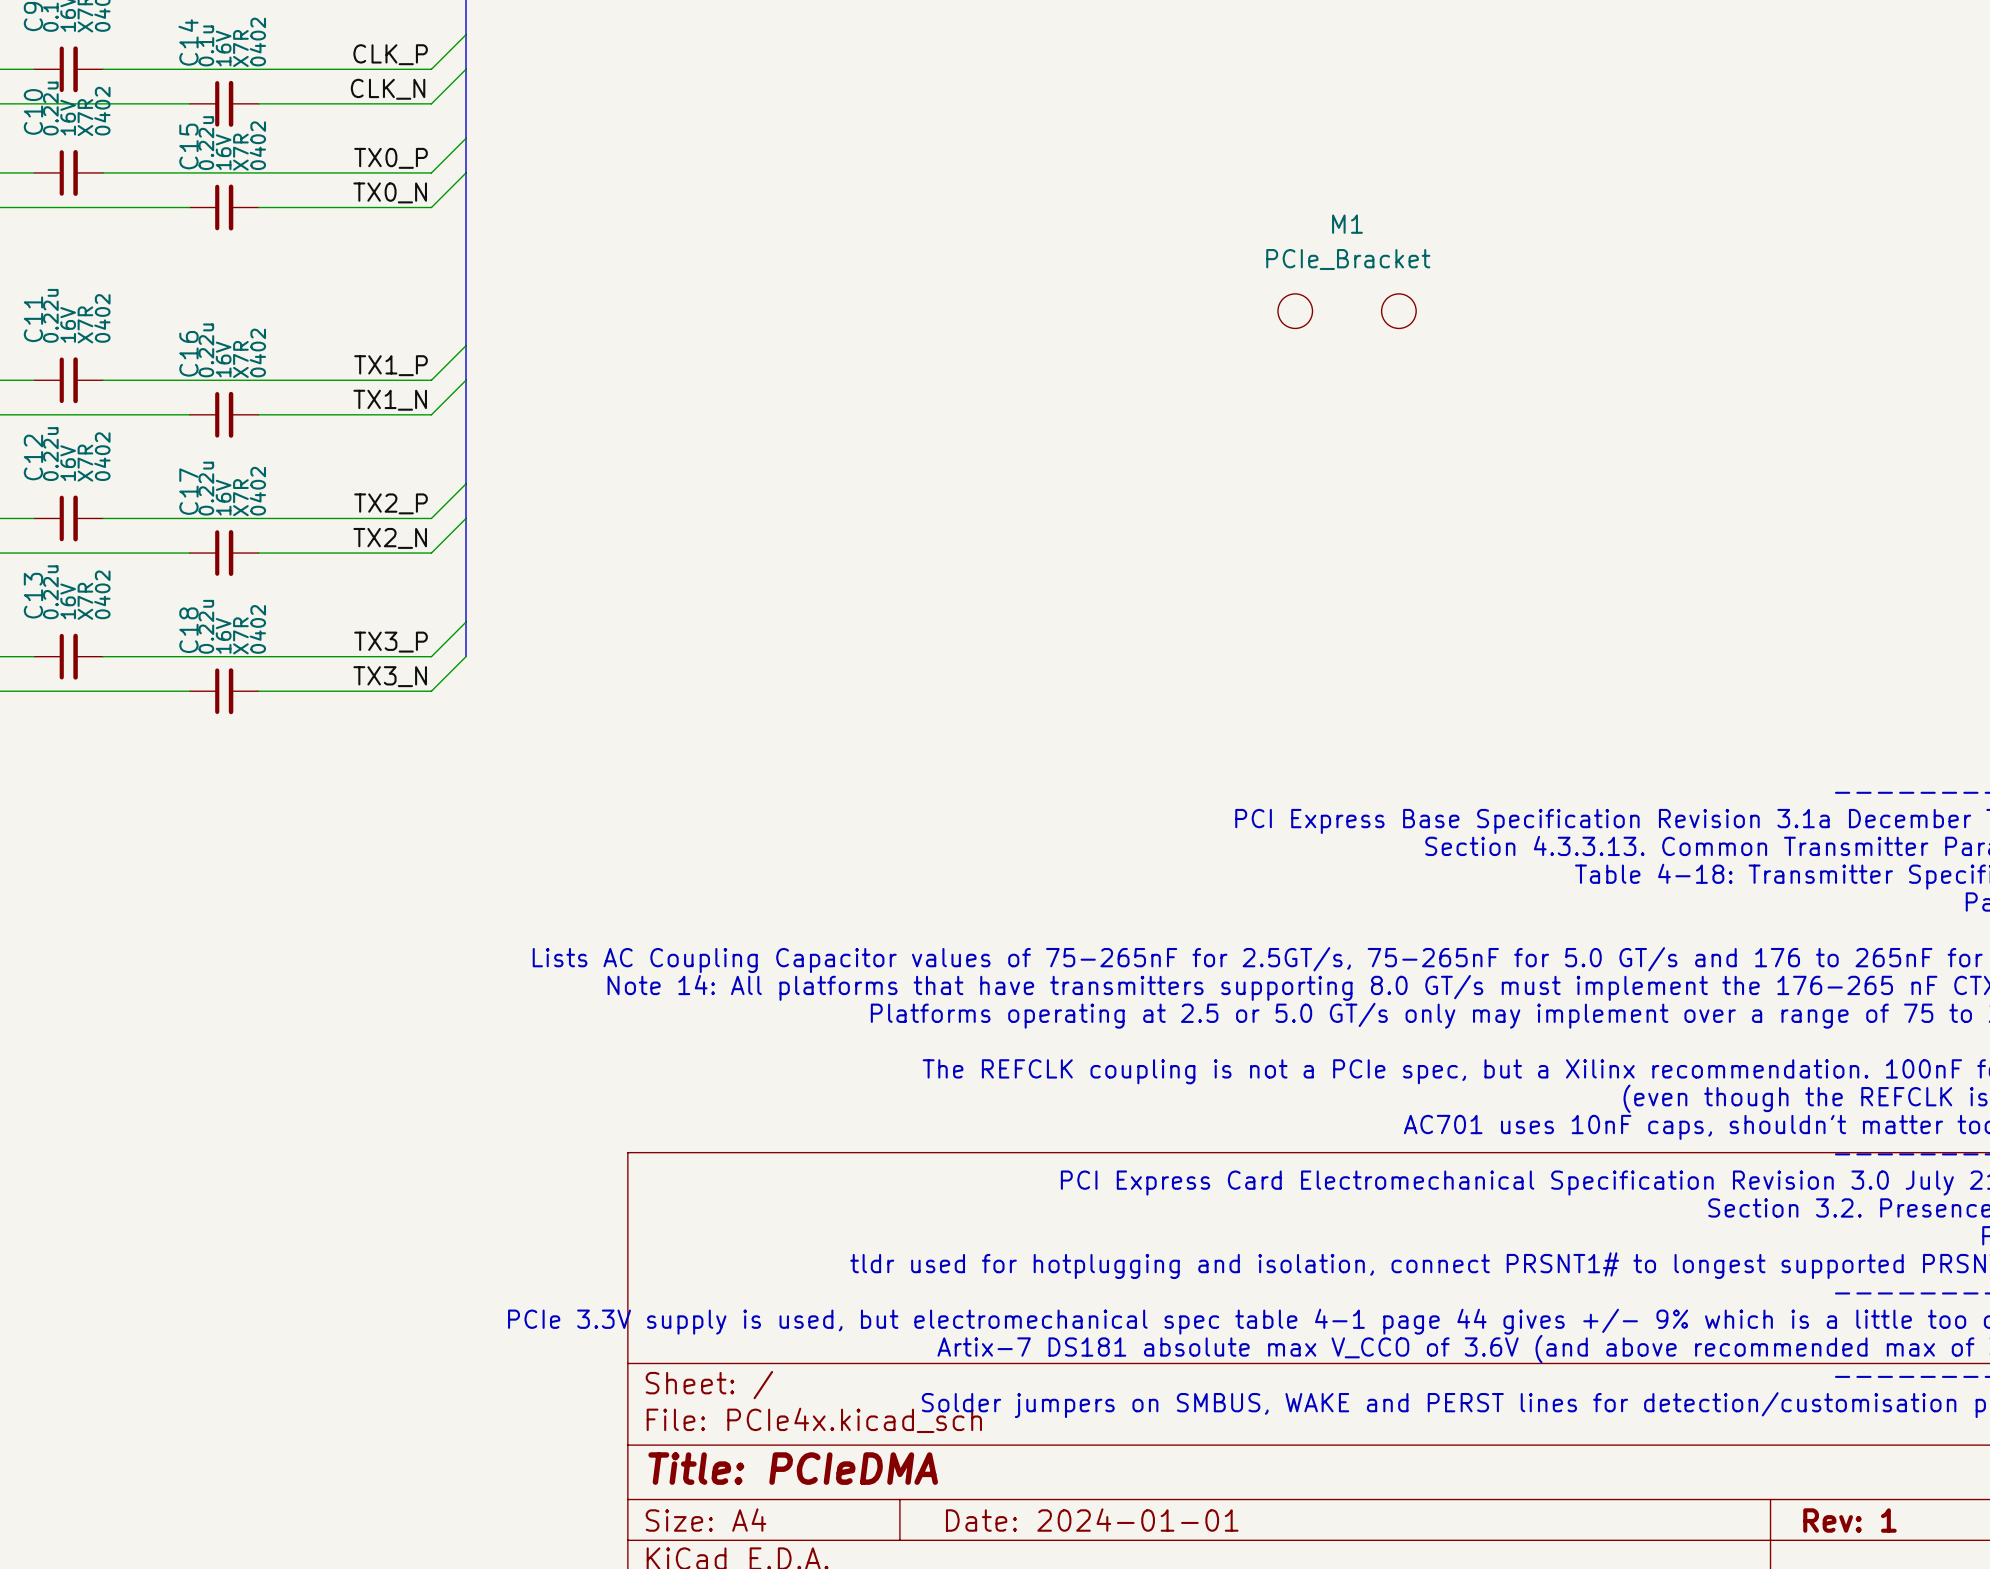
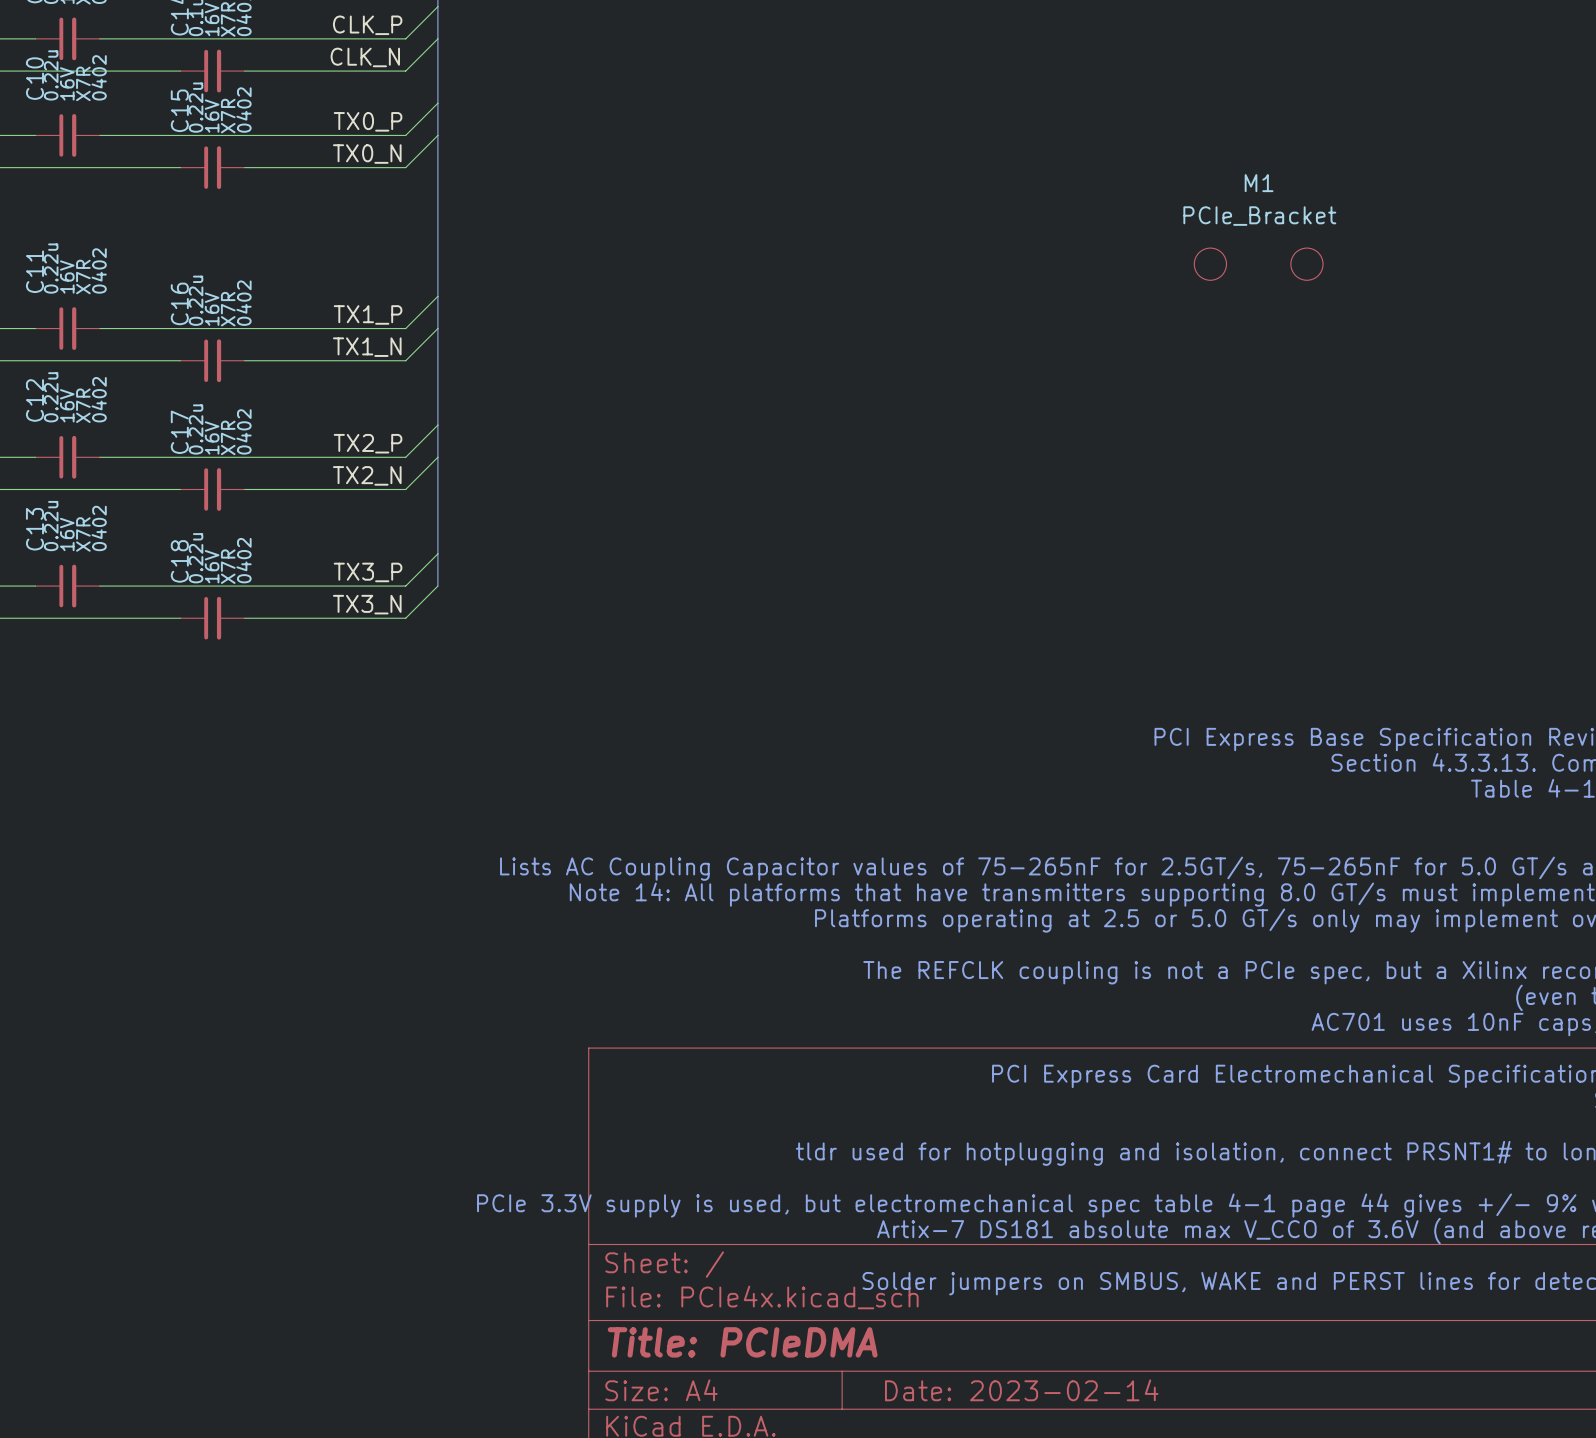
title block: Date: 2024-01-01 (1092, 1520) -> Date: 2023-02-14 (1021, 1390)

